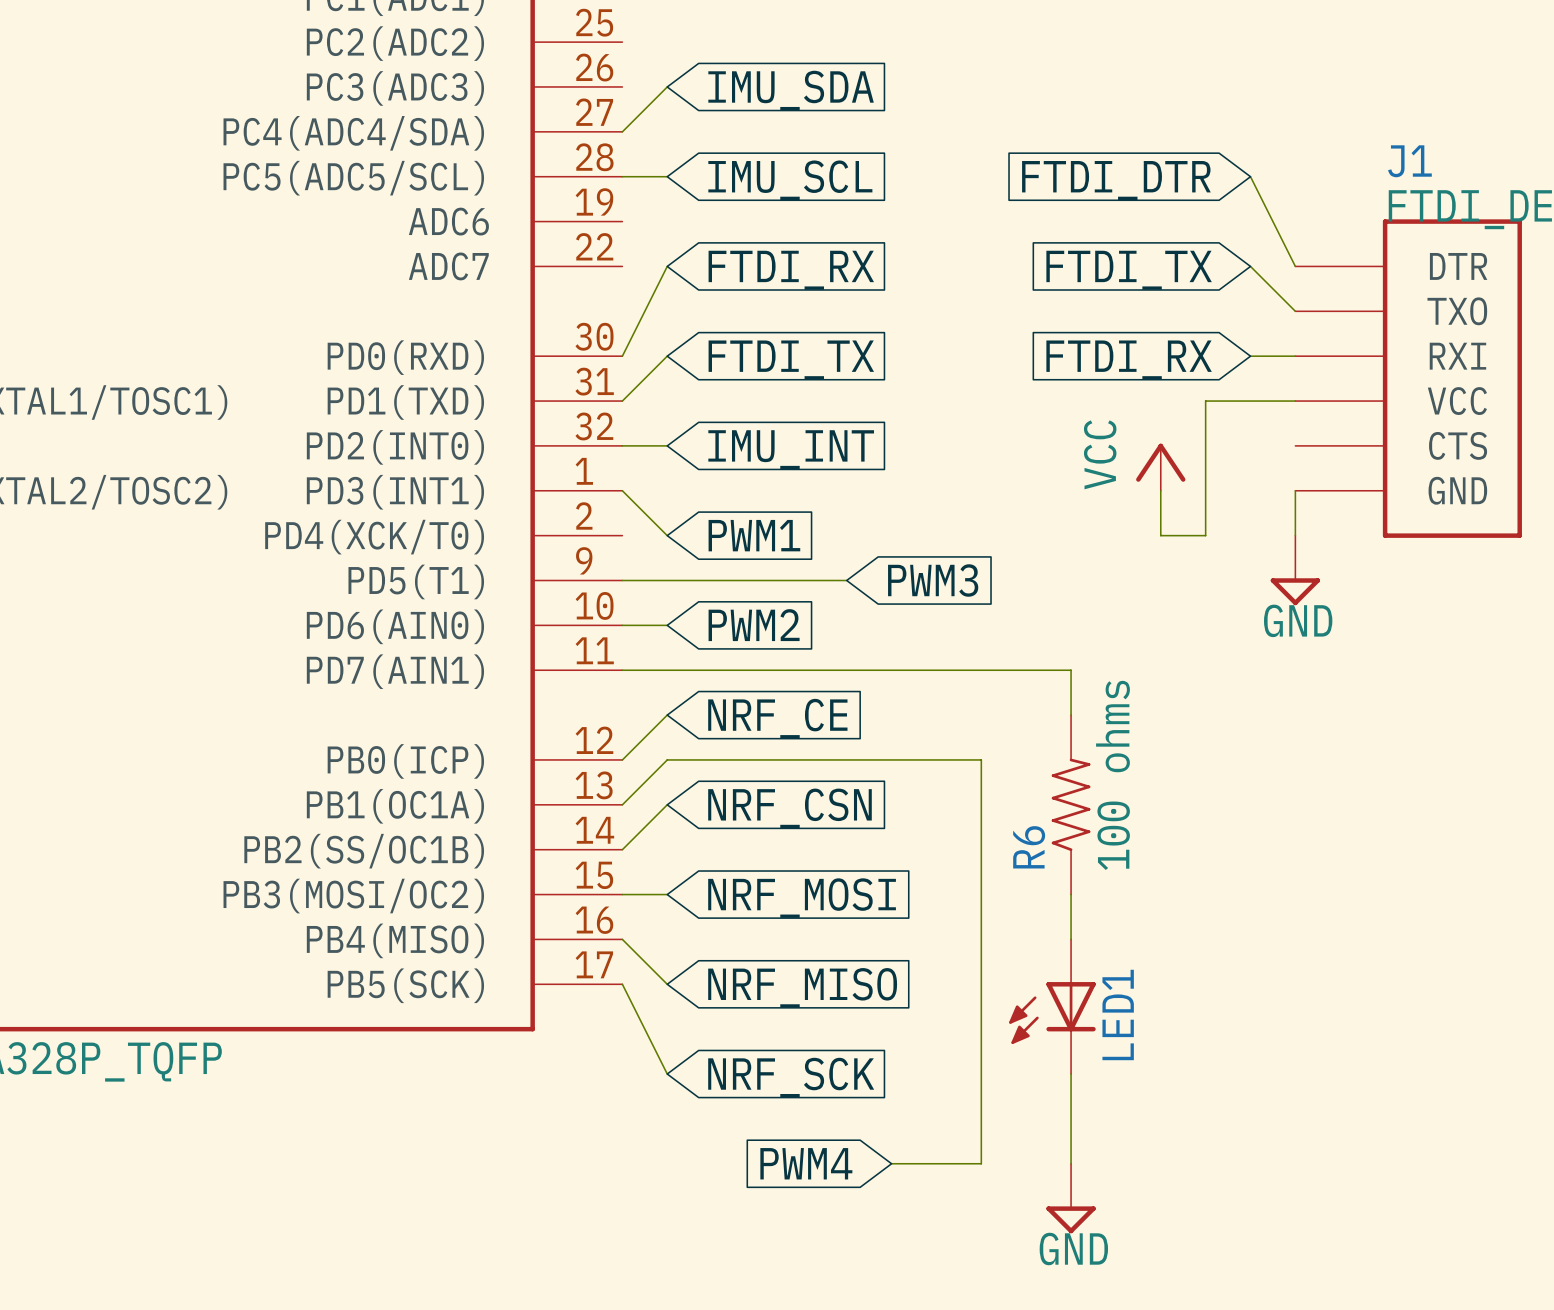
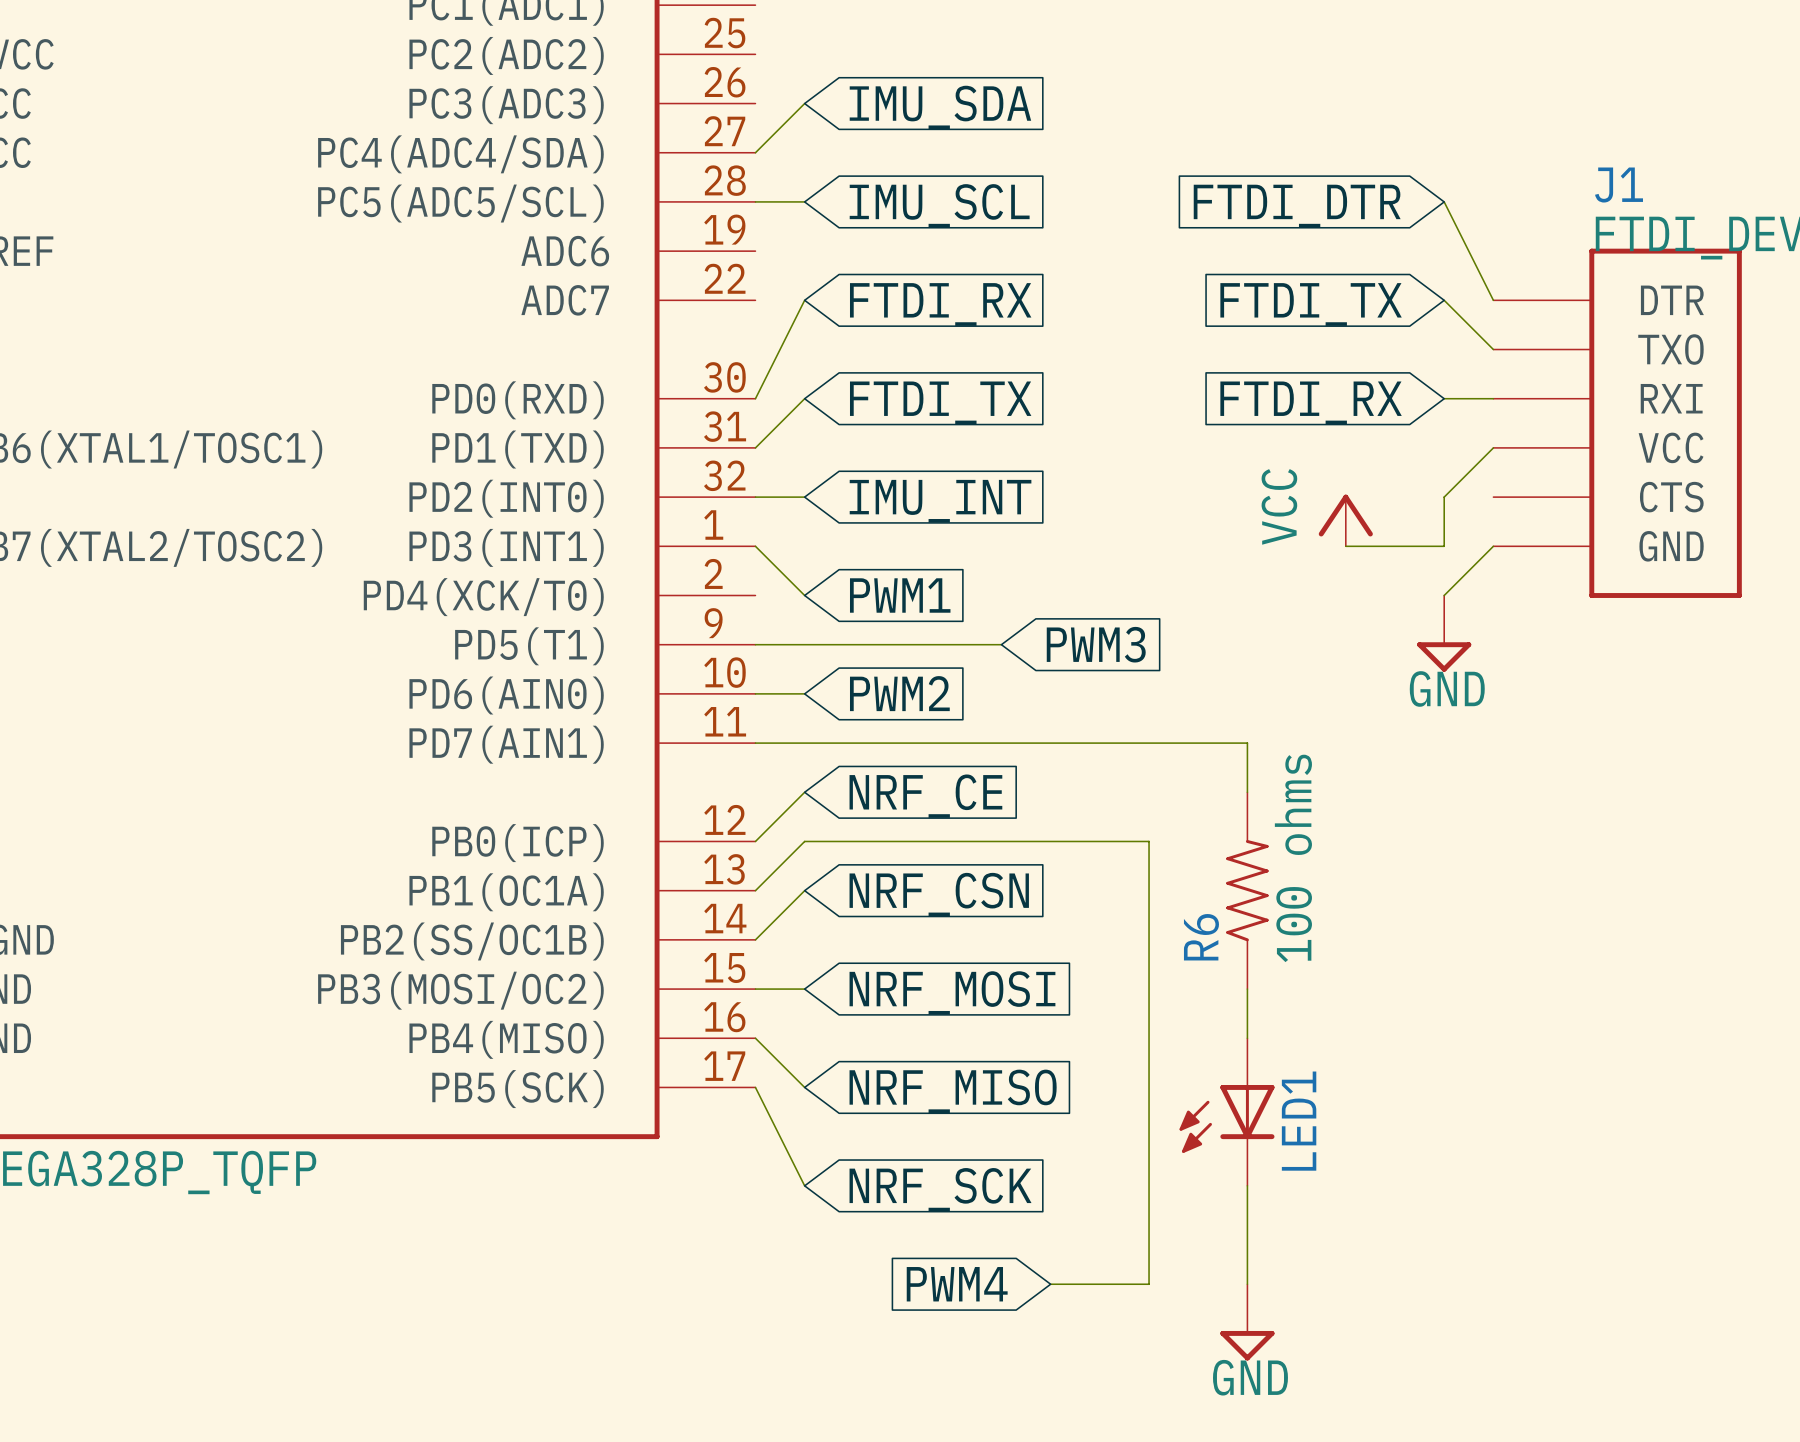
wire: (1295, 401) (1205, 401) (1205, 535) (1160, 535) (1160, 490) -> (1493, 447) (1444, 497) (1444, 546) (1345, 546)
wire: (1295, 490) (1295, 535) -> (1493, 546) (1444, 595)
power symbol position: GND (1295, 570) -> GND (1444, 633)

